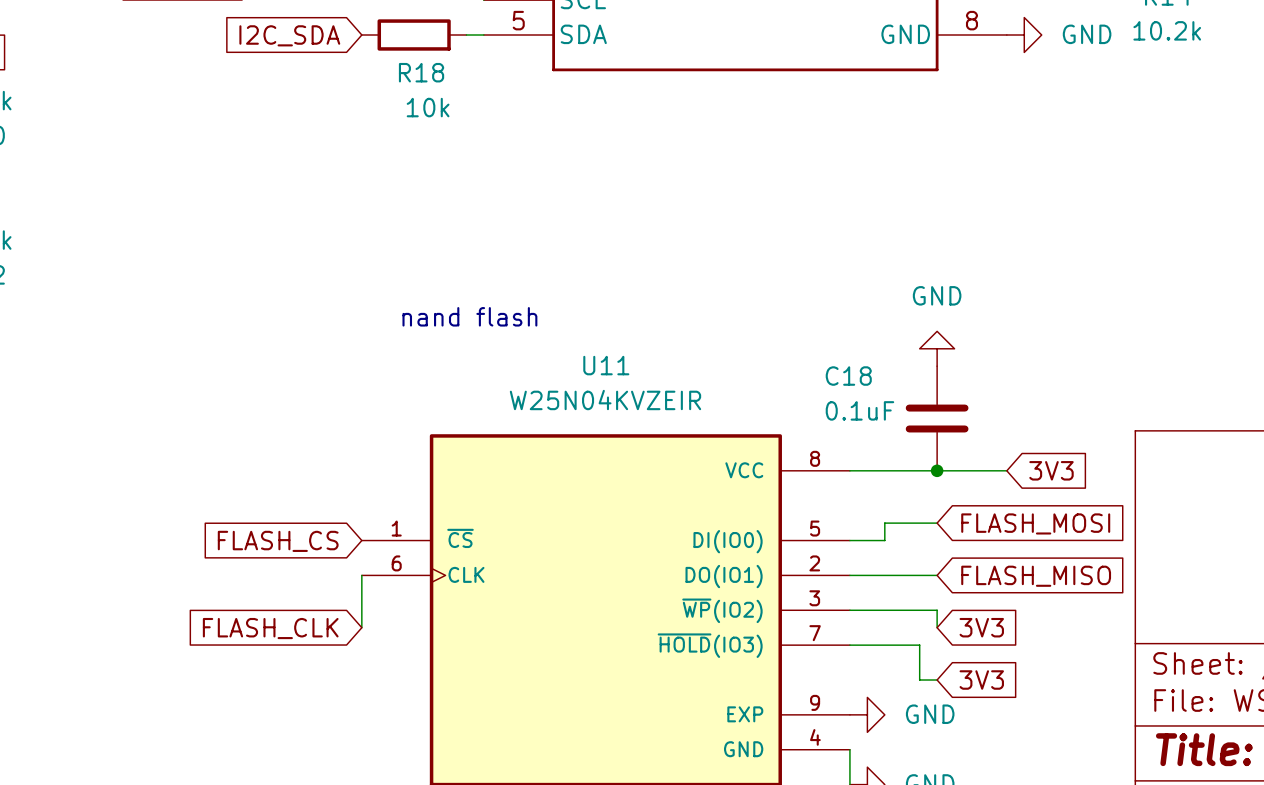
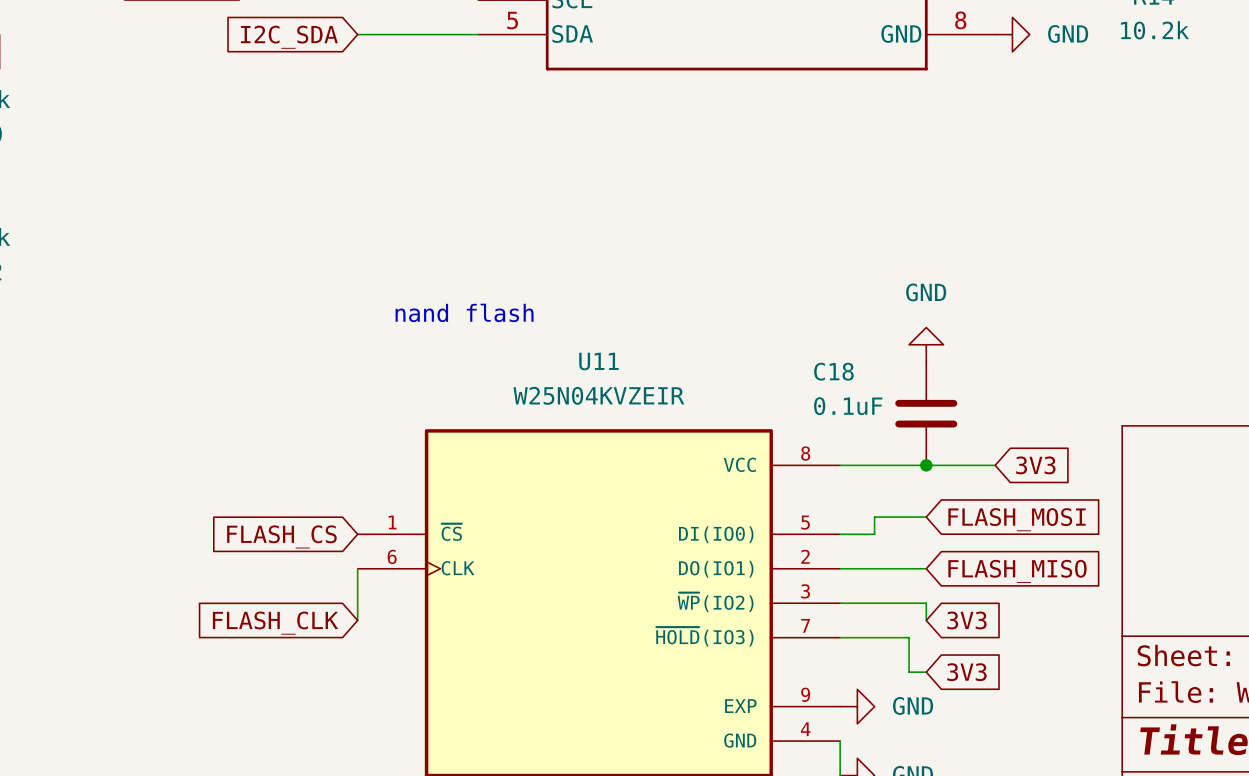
wire: none -> (357, 34) (461, 34)
R18: 10k (414, 35) -> none

